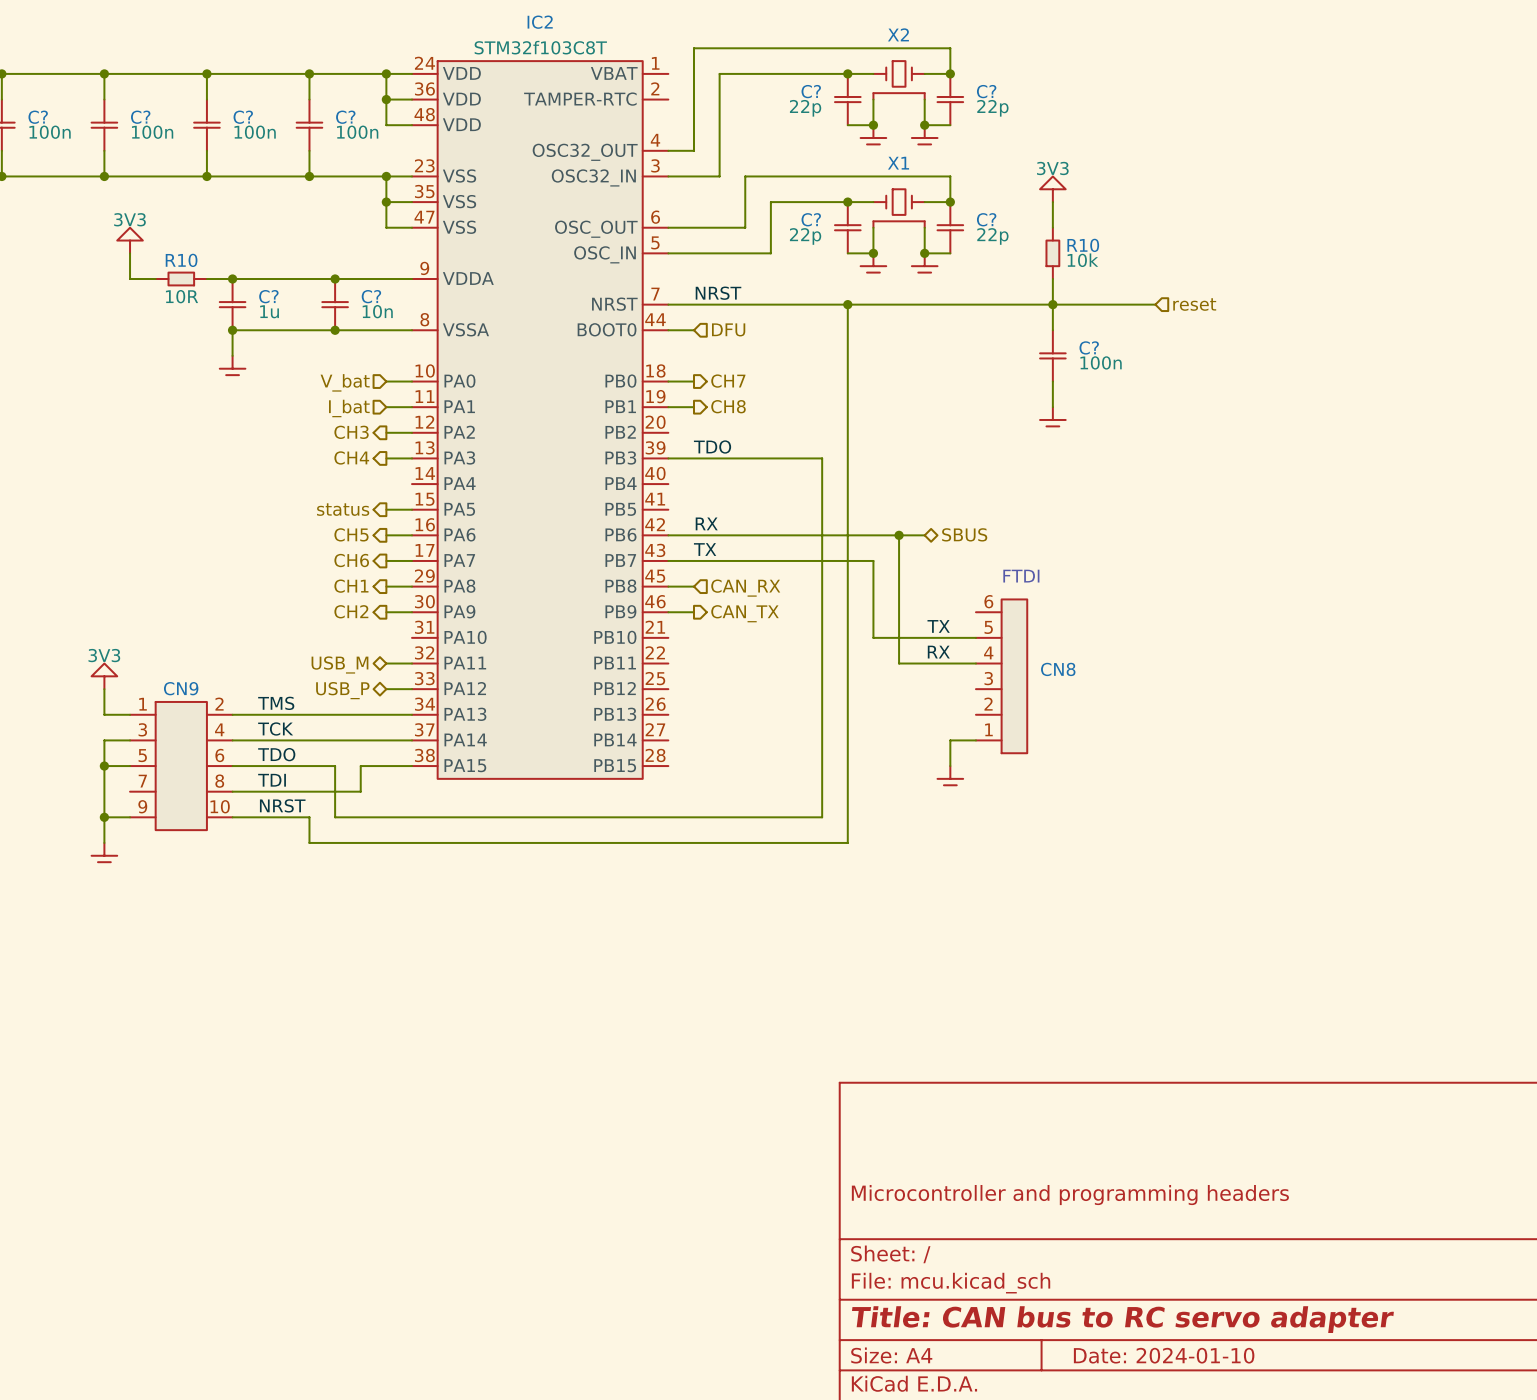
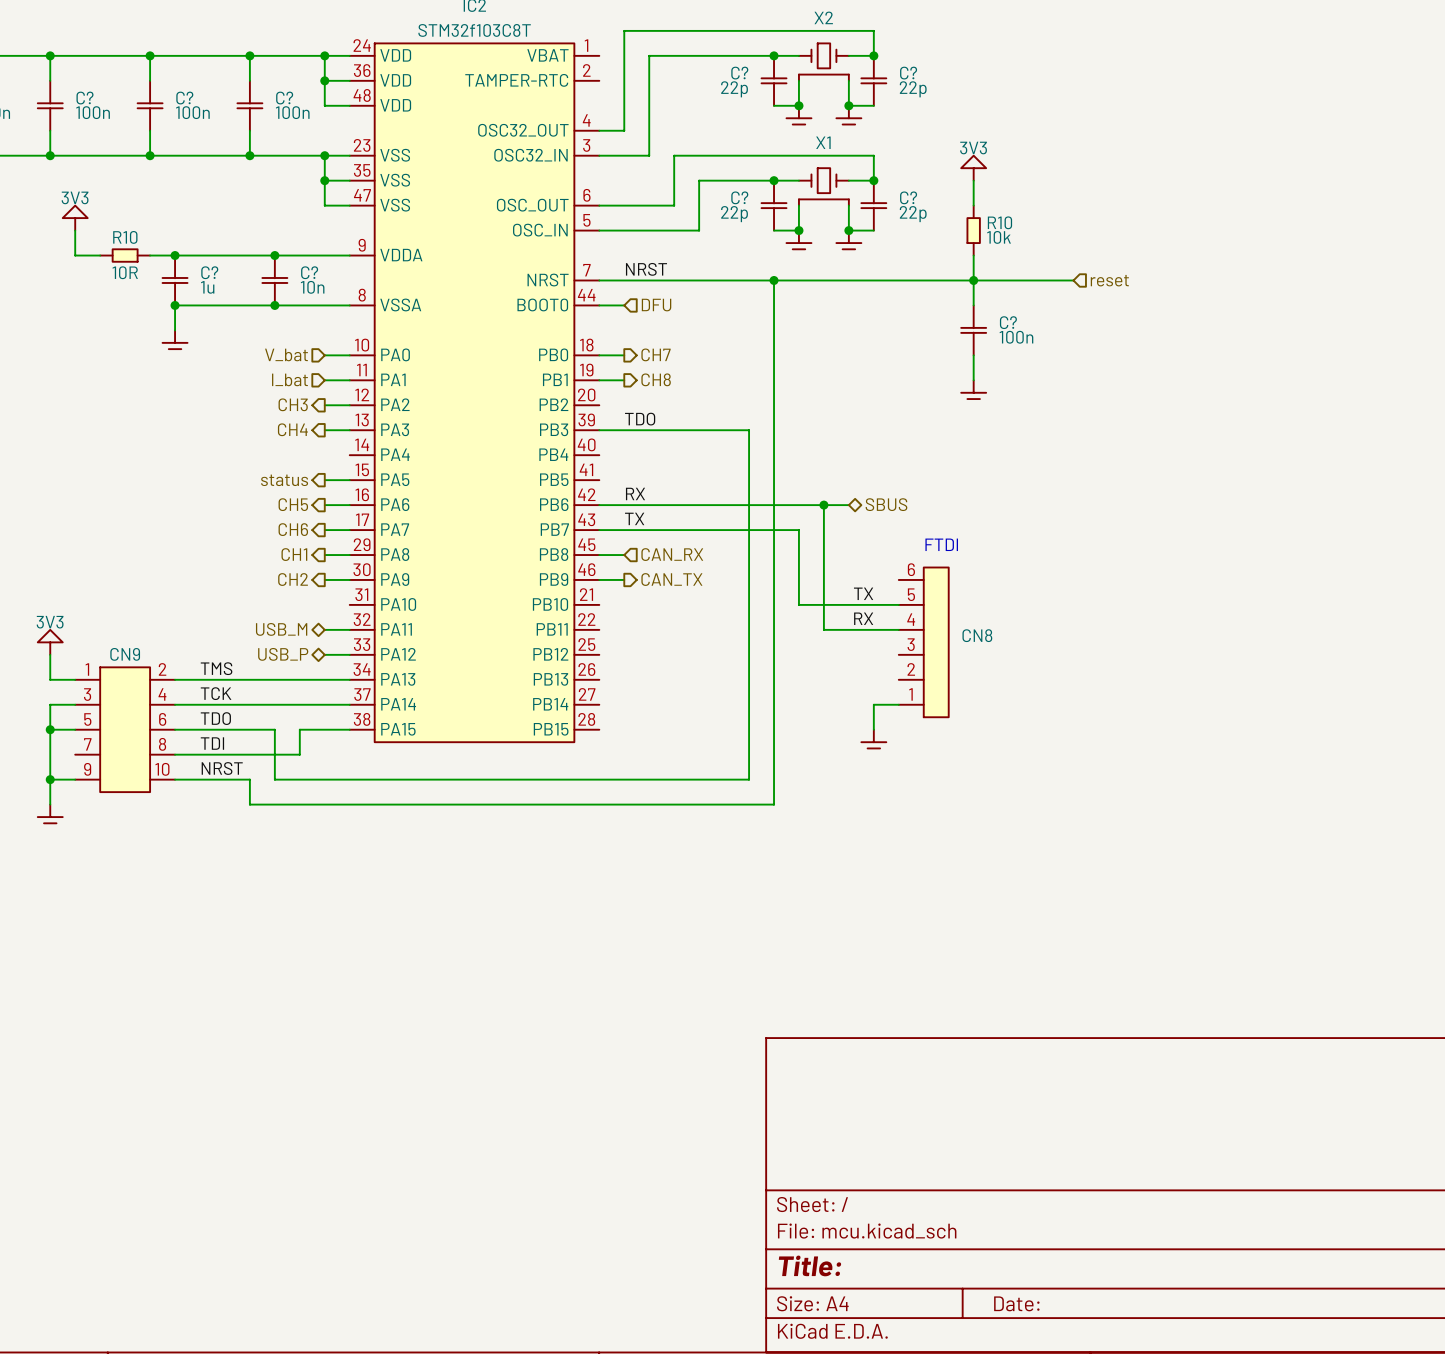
title block: Microcontroller and programming headers (1070, 1195) -> none
title block: Title: CAN bus to RC servo adapter (1122, 1319) -> Title: (810, 1265)
title block: Date: 2024-01-10 (1164, 1355) -> Date: (1016, 1303)

